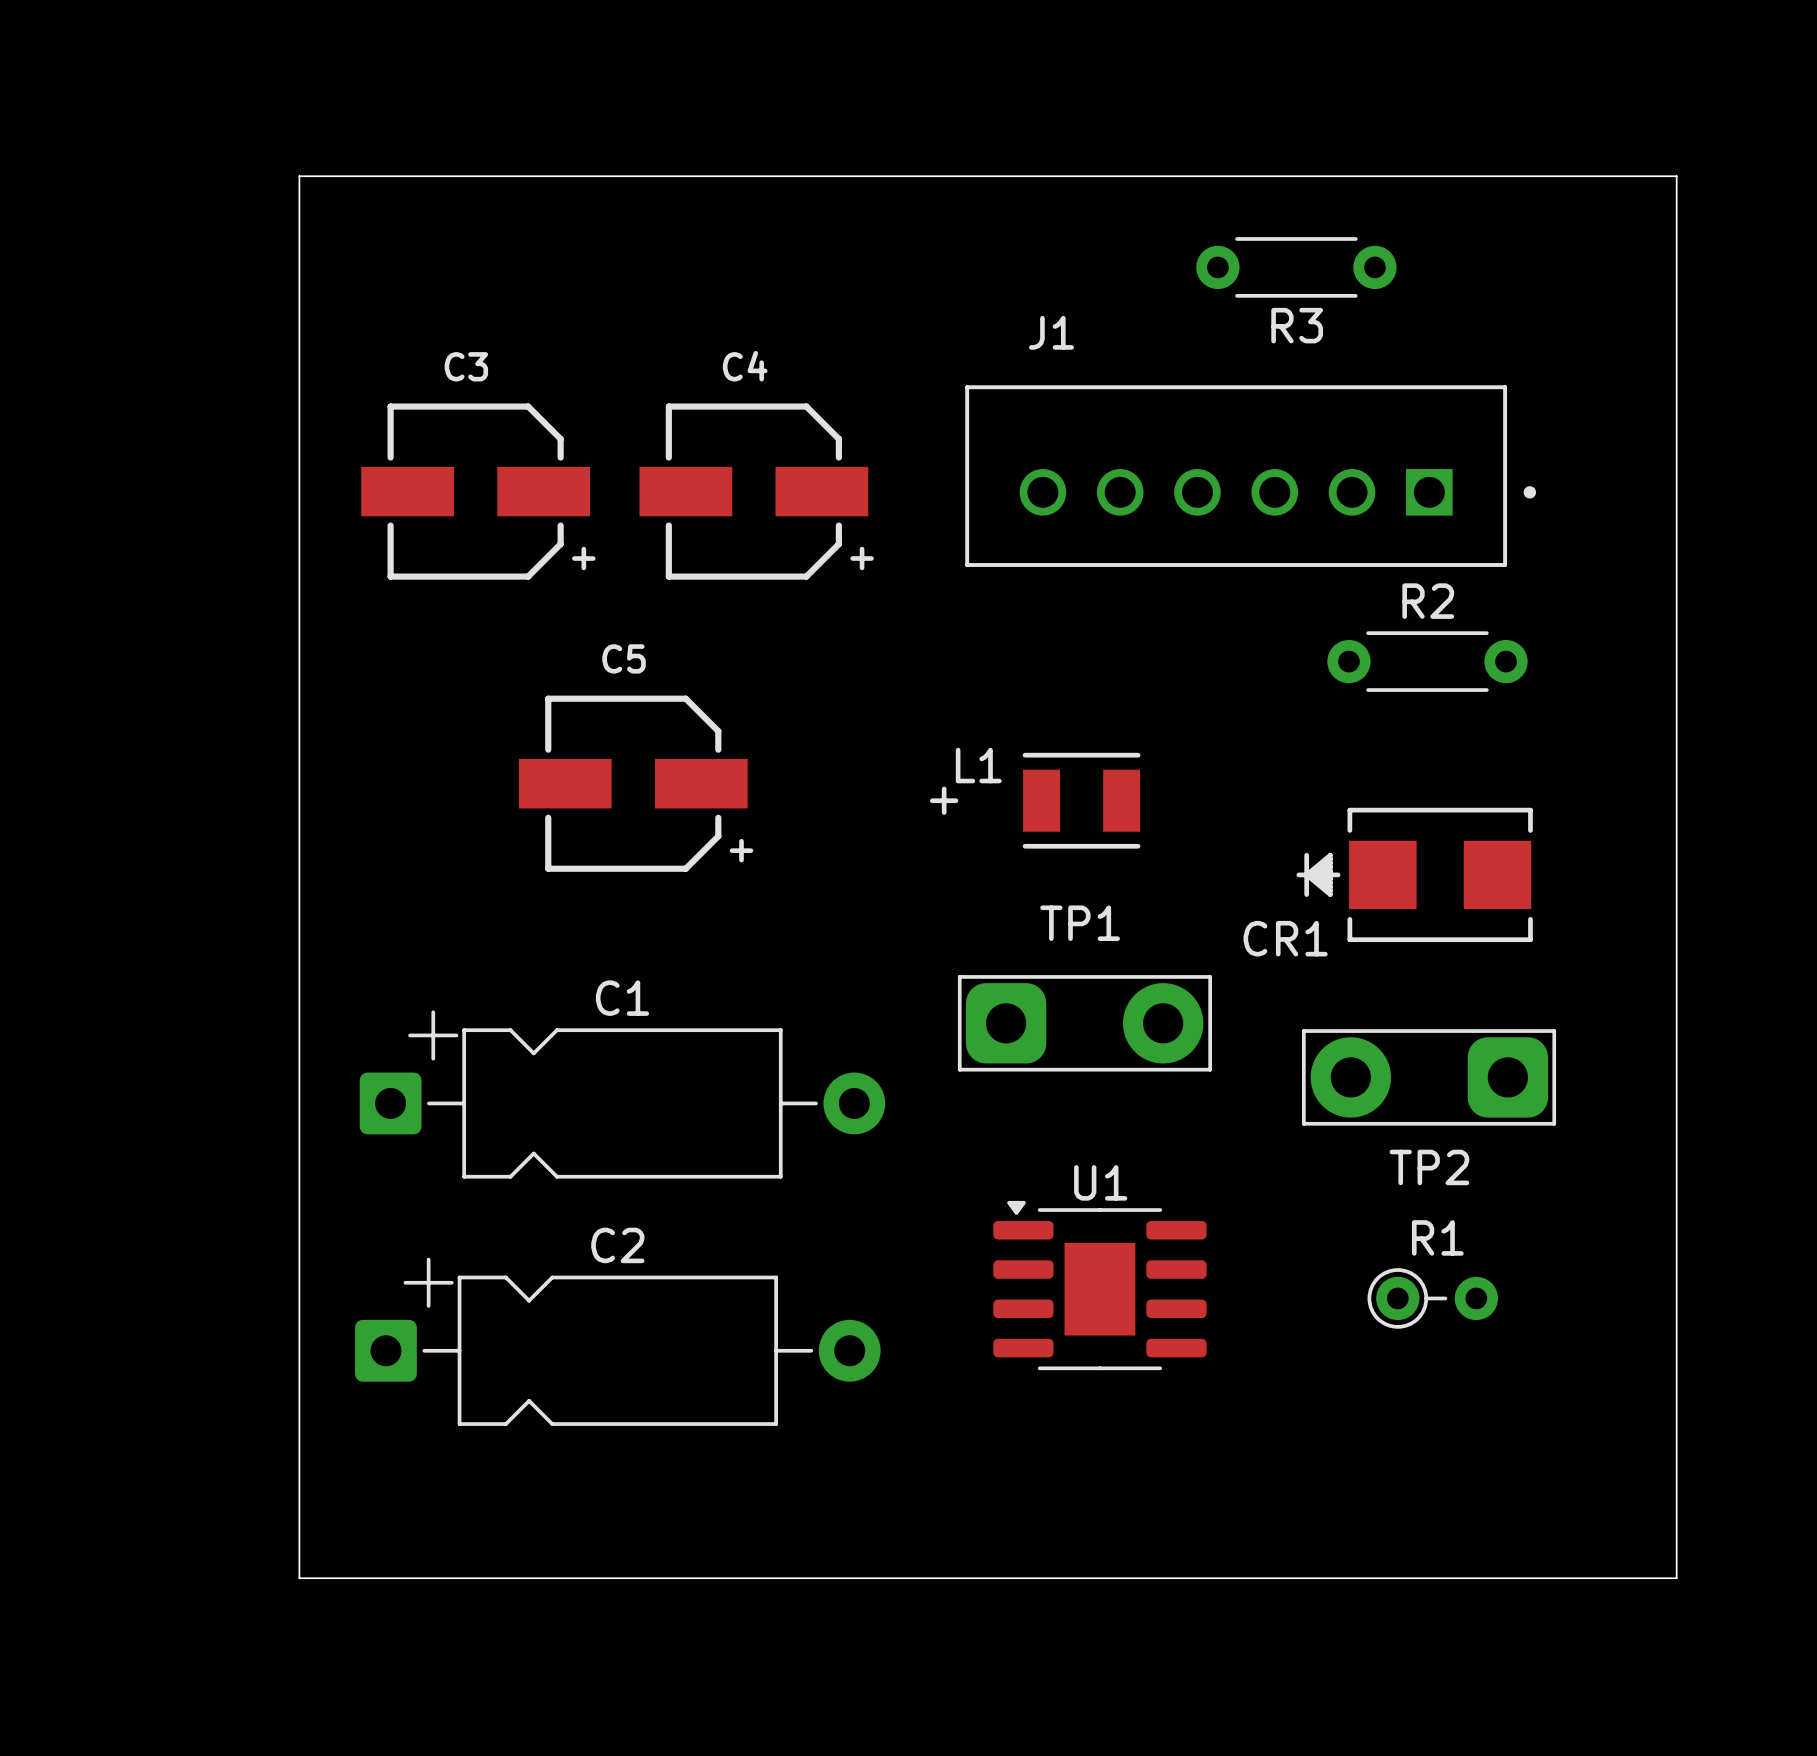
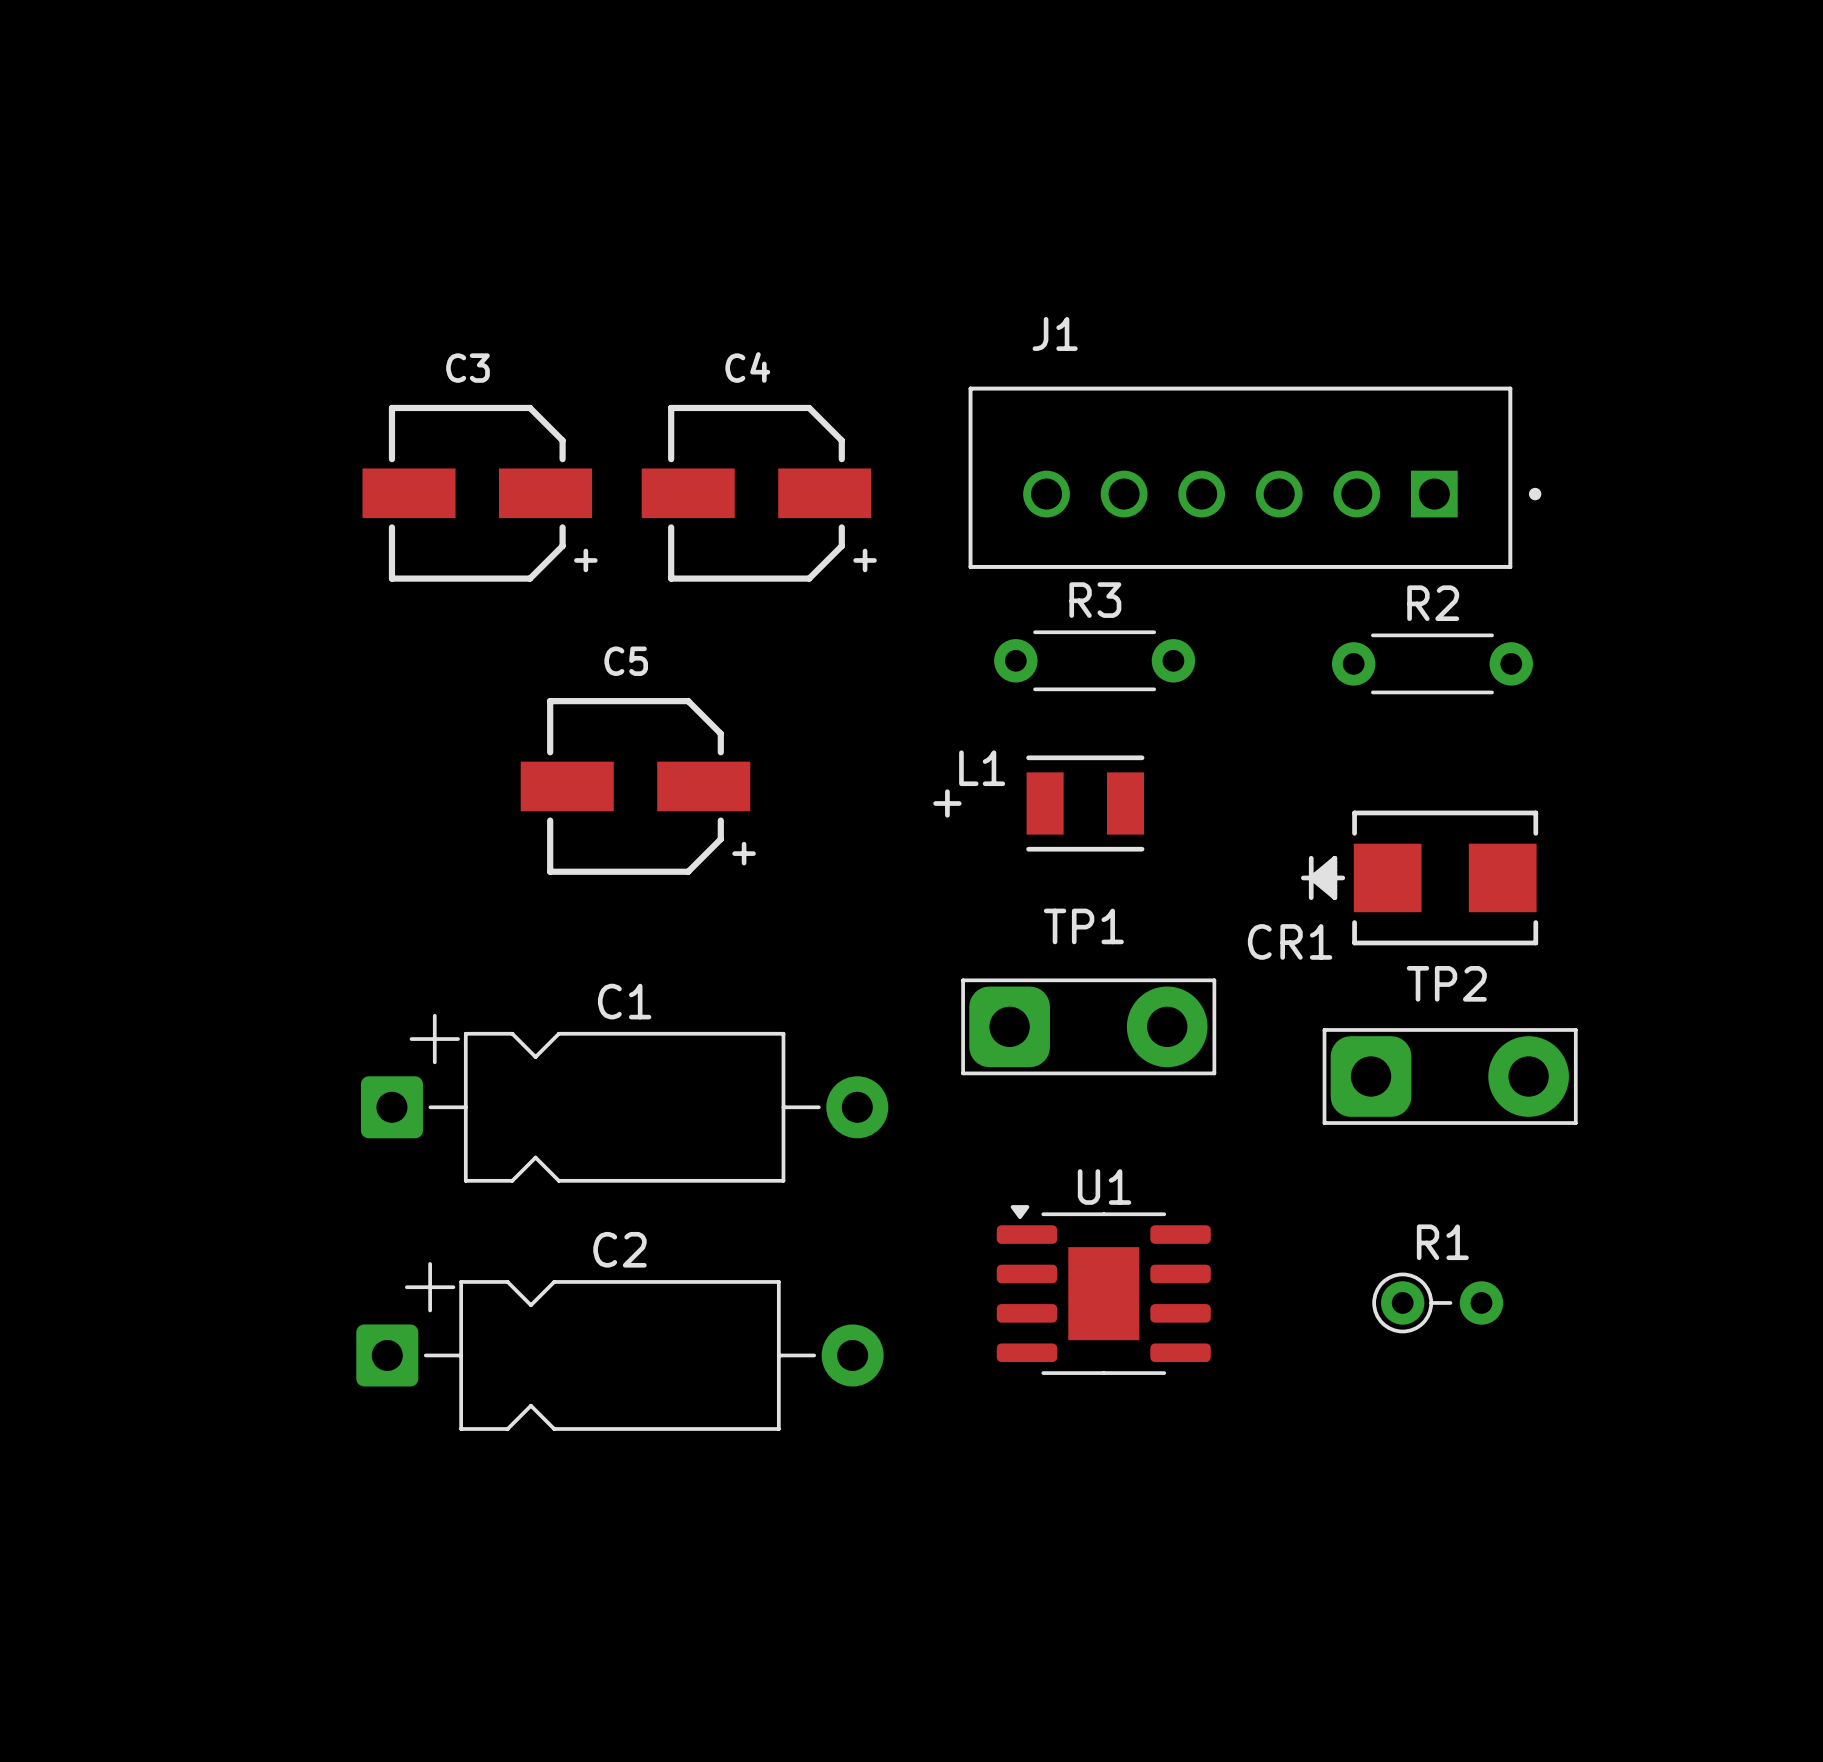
board edge: (299, 176) (1676, 176) (1676, 1578) (299, 1578) (299, 176) -> none
R3 position: (1296, 267) -> (1094, 660)
R3 name position: R3 (1297, 325) -> R3 (1095, 600)
TP2 rotation: 0° (1429, 1077) -> 180° (1450, 1076)

